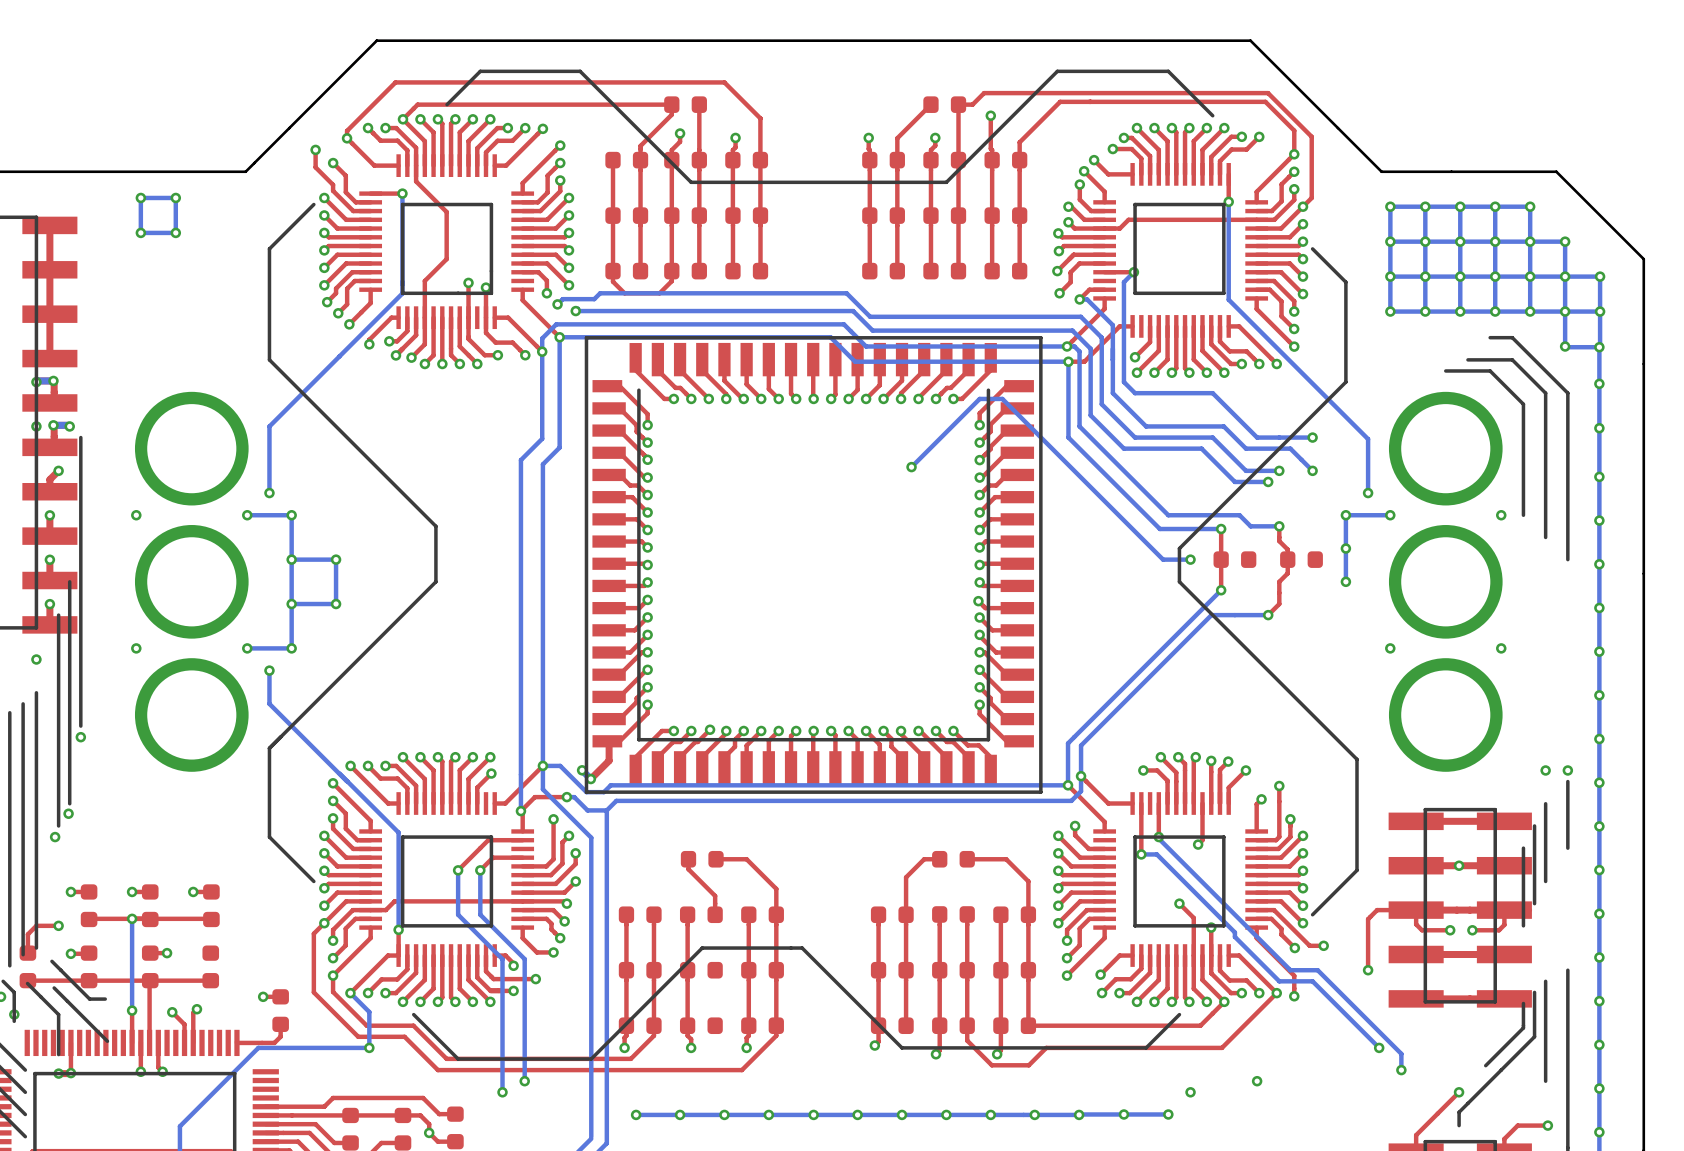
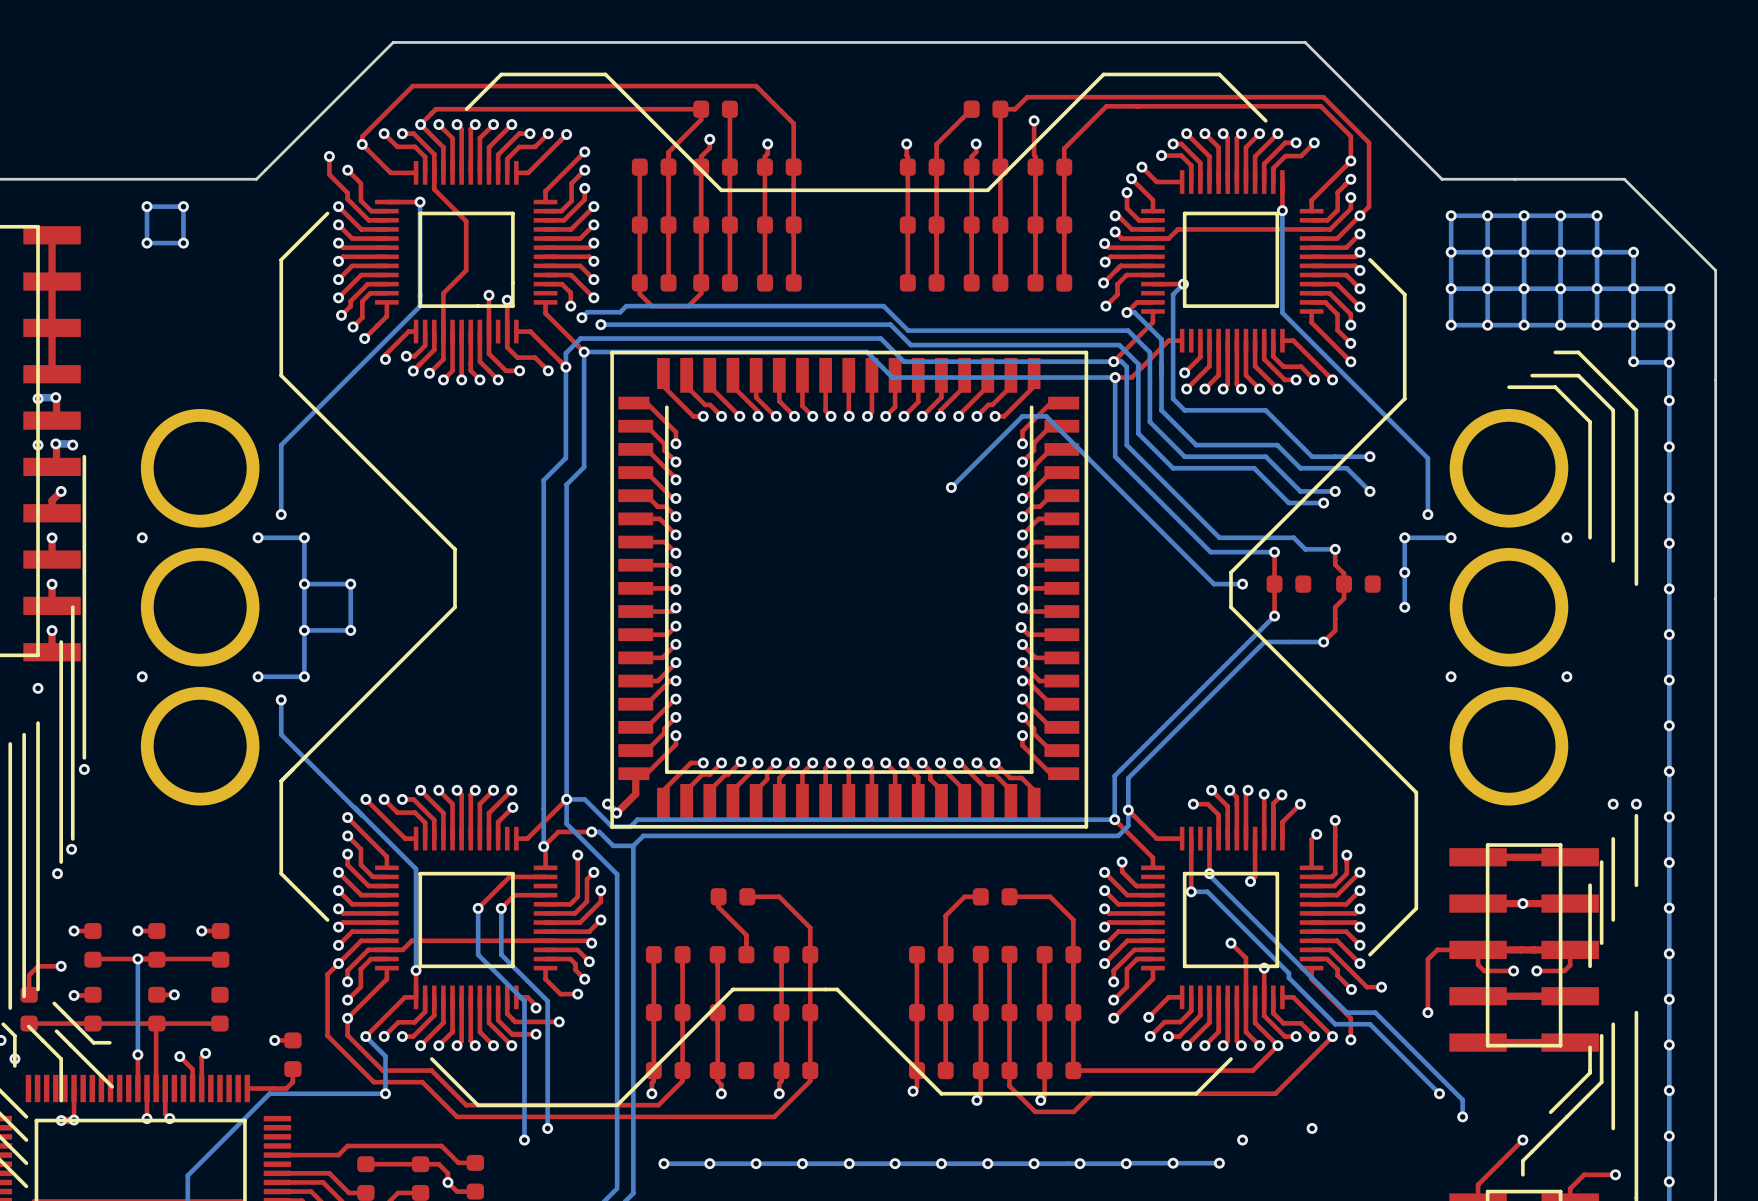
top track: (350, 1115) (265, 1115) -> none

